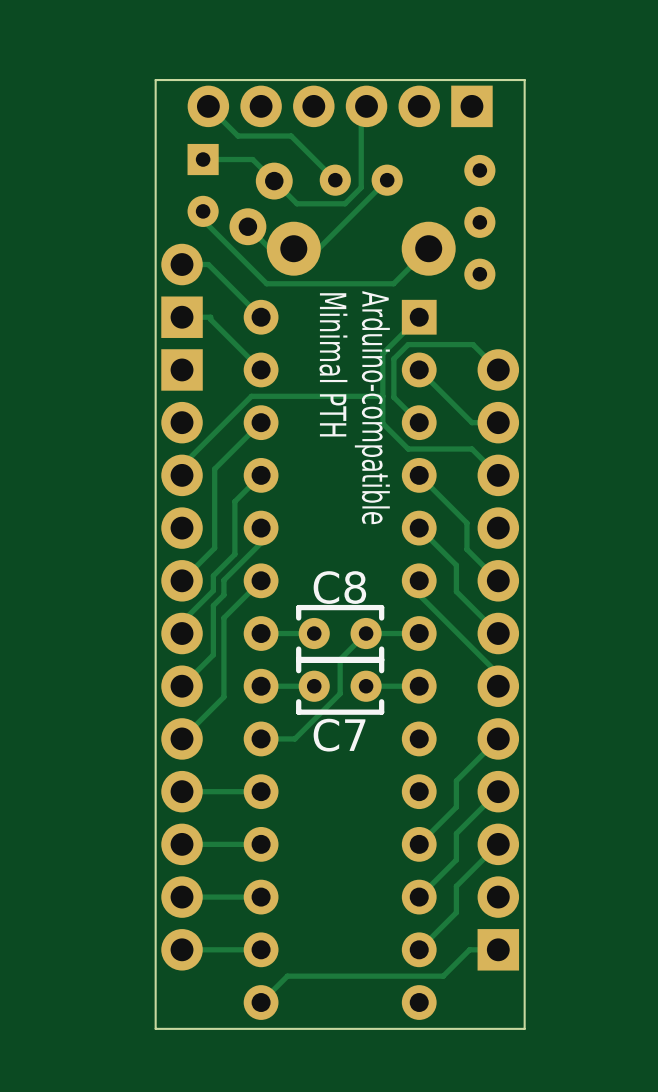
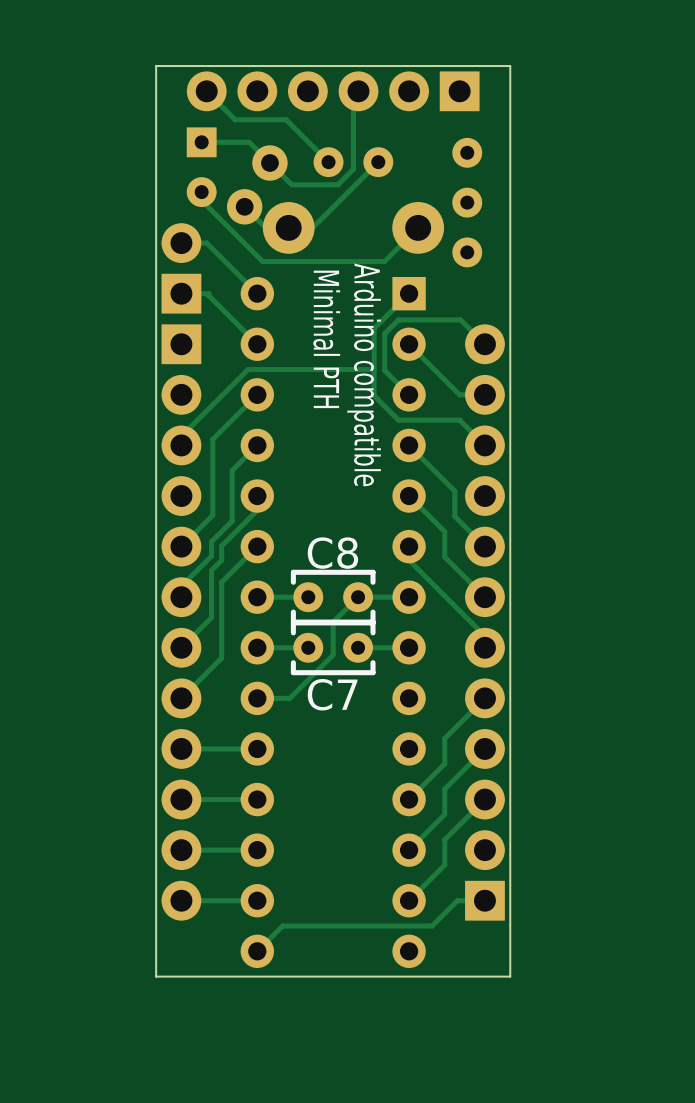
text: Arduino-compatible (372, 407) -> Arduino compatible (364, 374)

